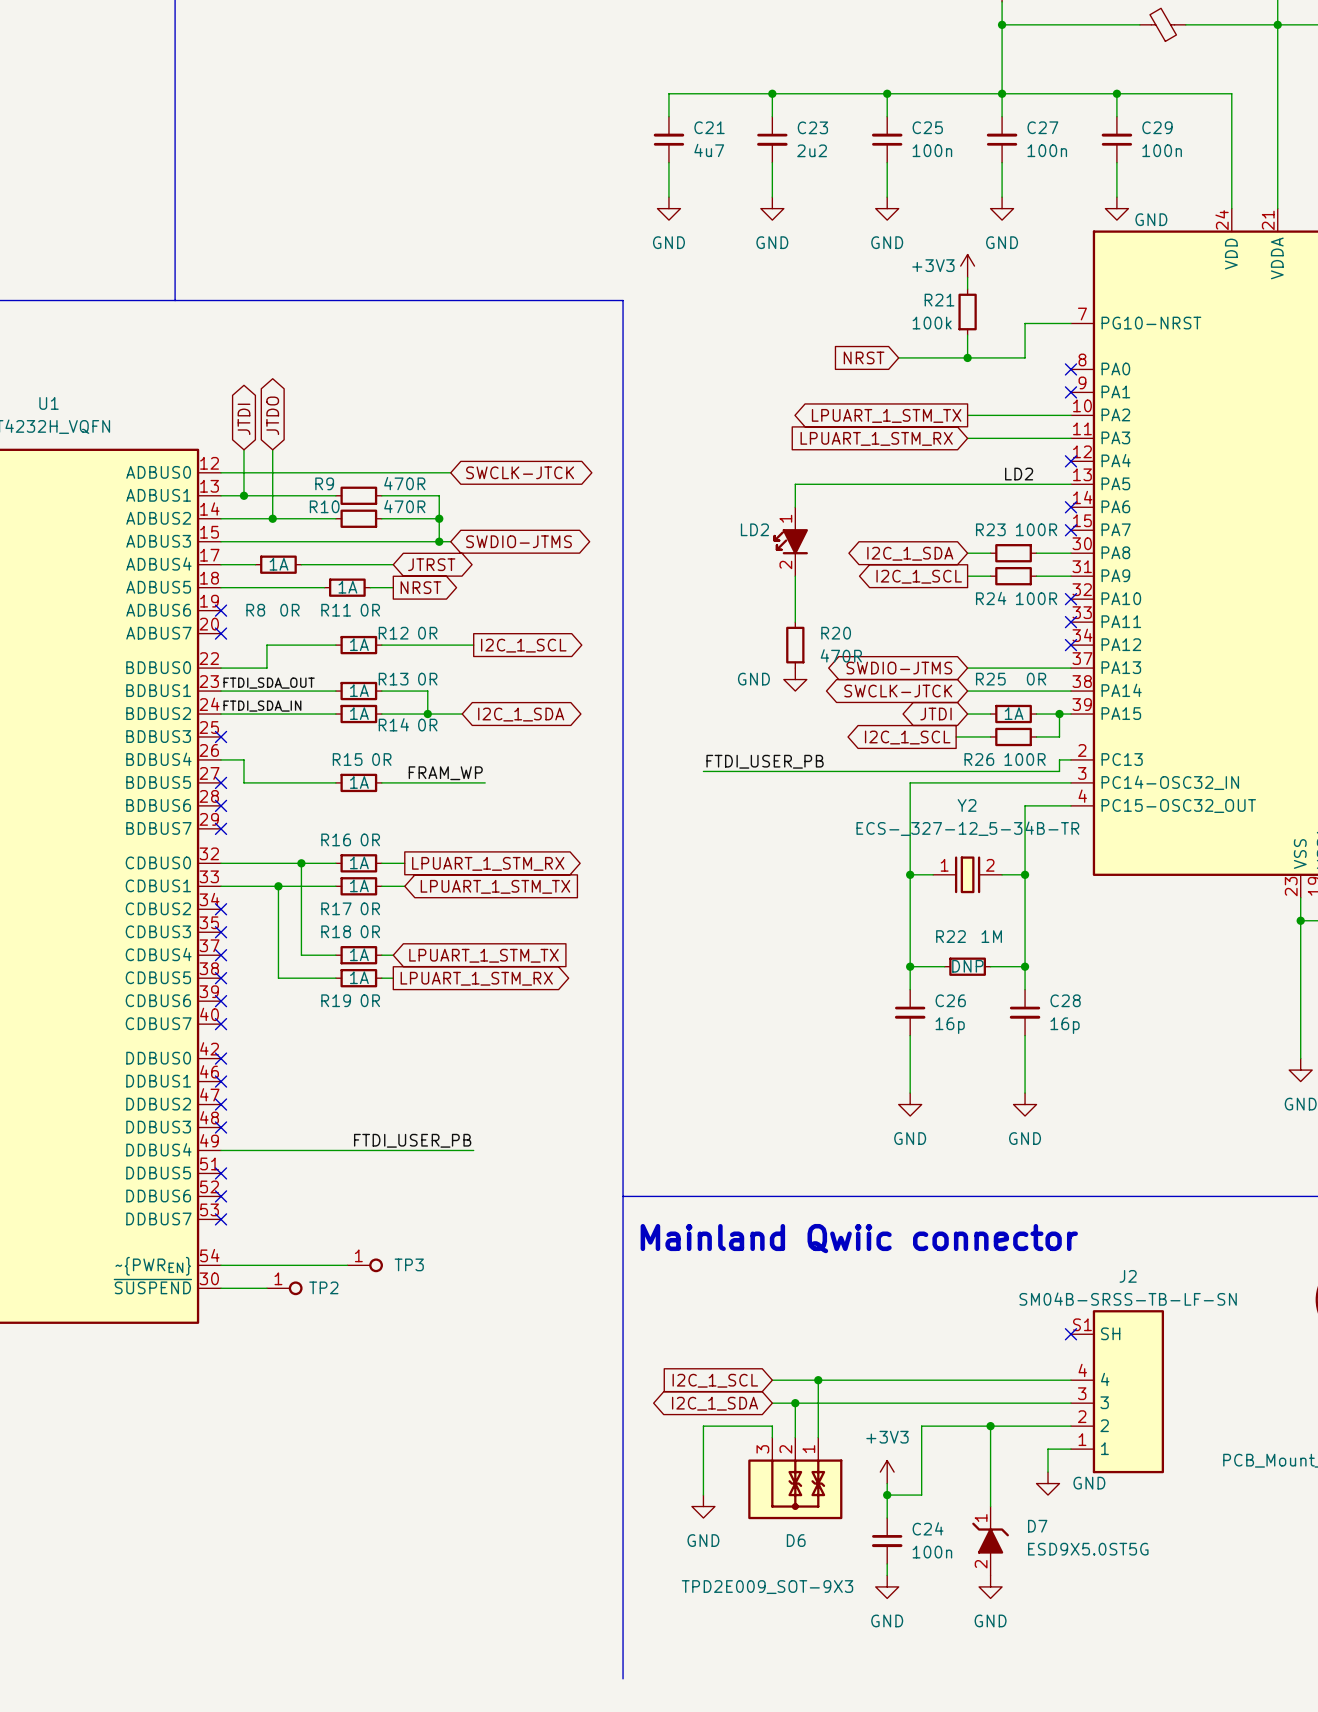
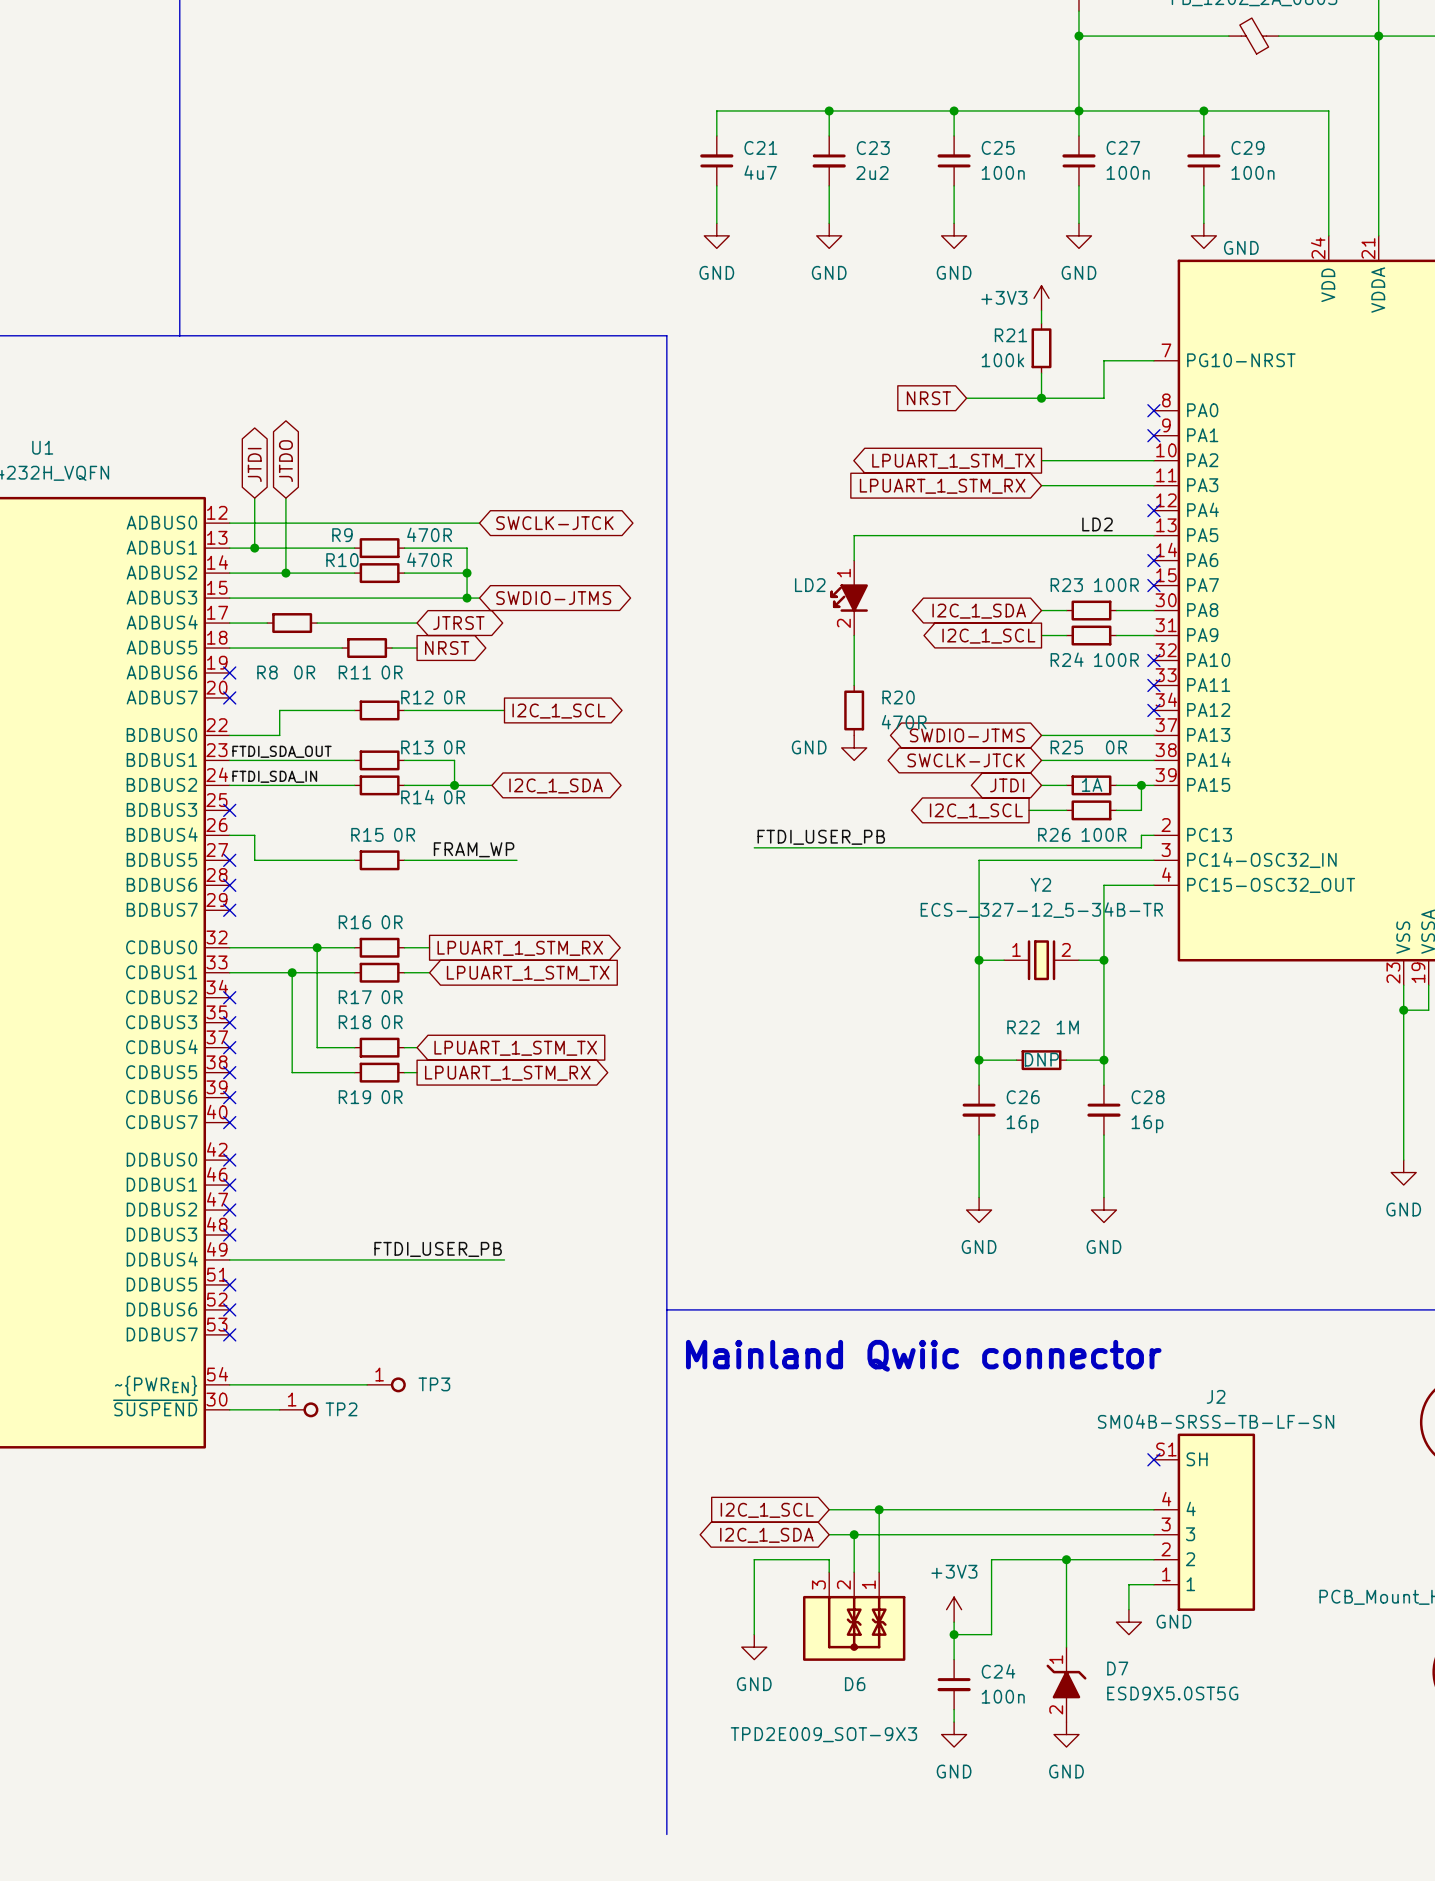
R8 text: 1A (278, 564) -> none
R11 text: 1A (347, 587) -> none
R12 text: 1A (359, 644) -> none
R13 text: 1A (359, 690) -> none
R14 text: 1A (359, 713) -> none
R15 text: 1A (359, 782) -> none
R16 text: 1A (359, 862) -> none
R17 text: 1A (359, 885) -> none
R18 text: 1A (359, 954) -> none
R19 text: 1A (359, 977) -> none

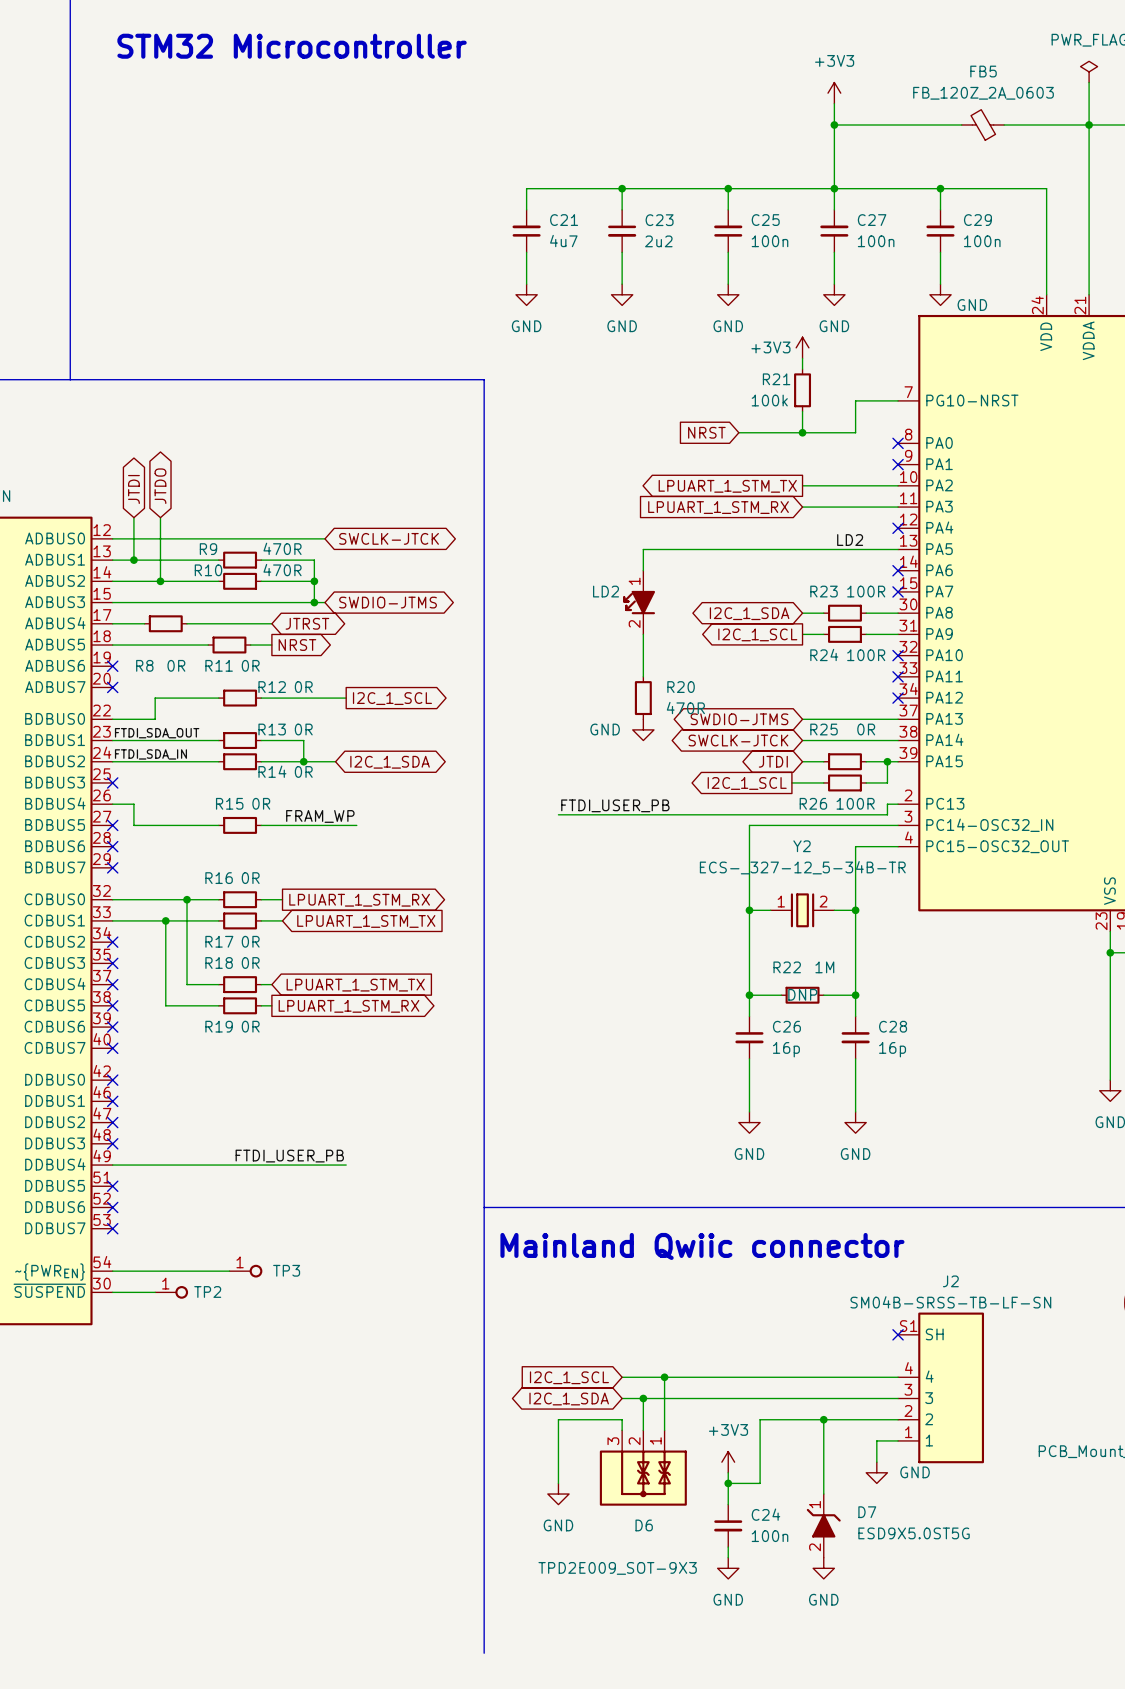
R25 text: 1A (1092, 784) -> none

